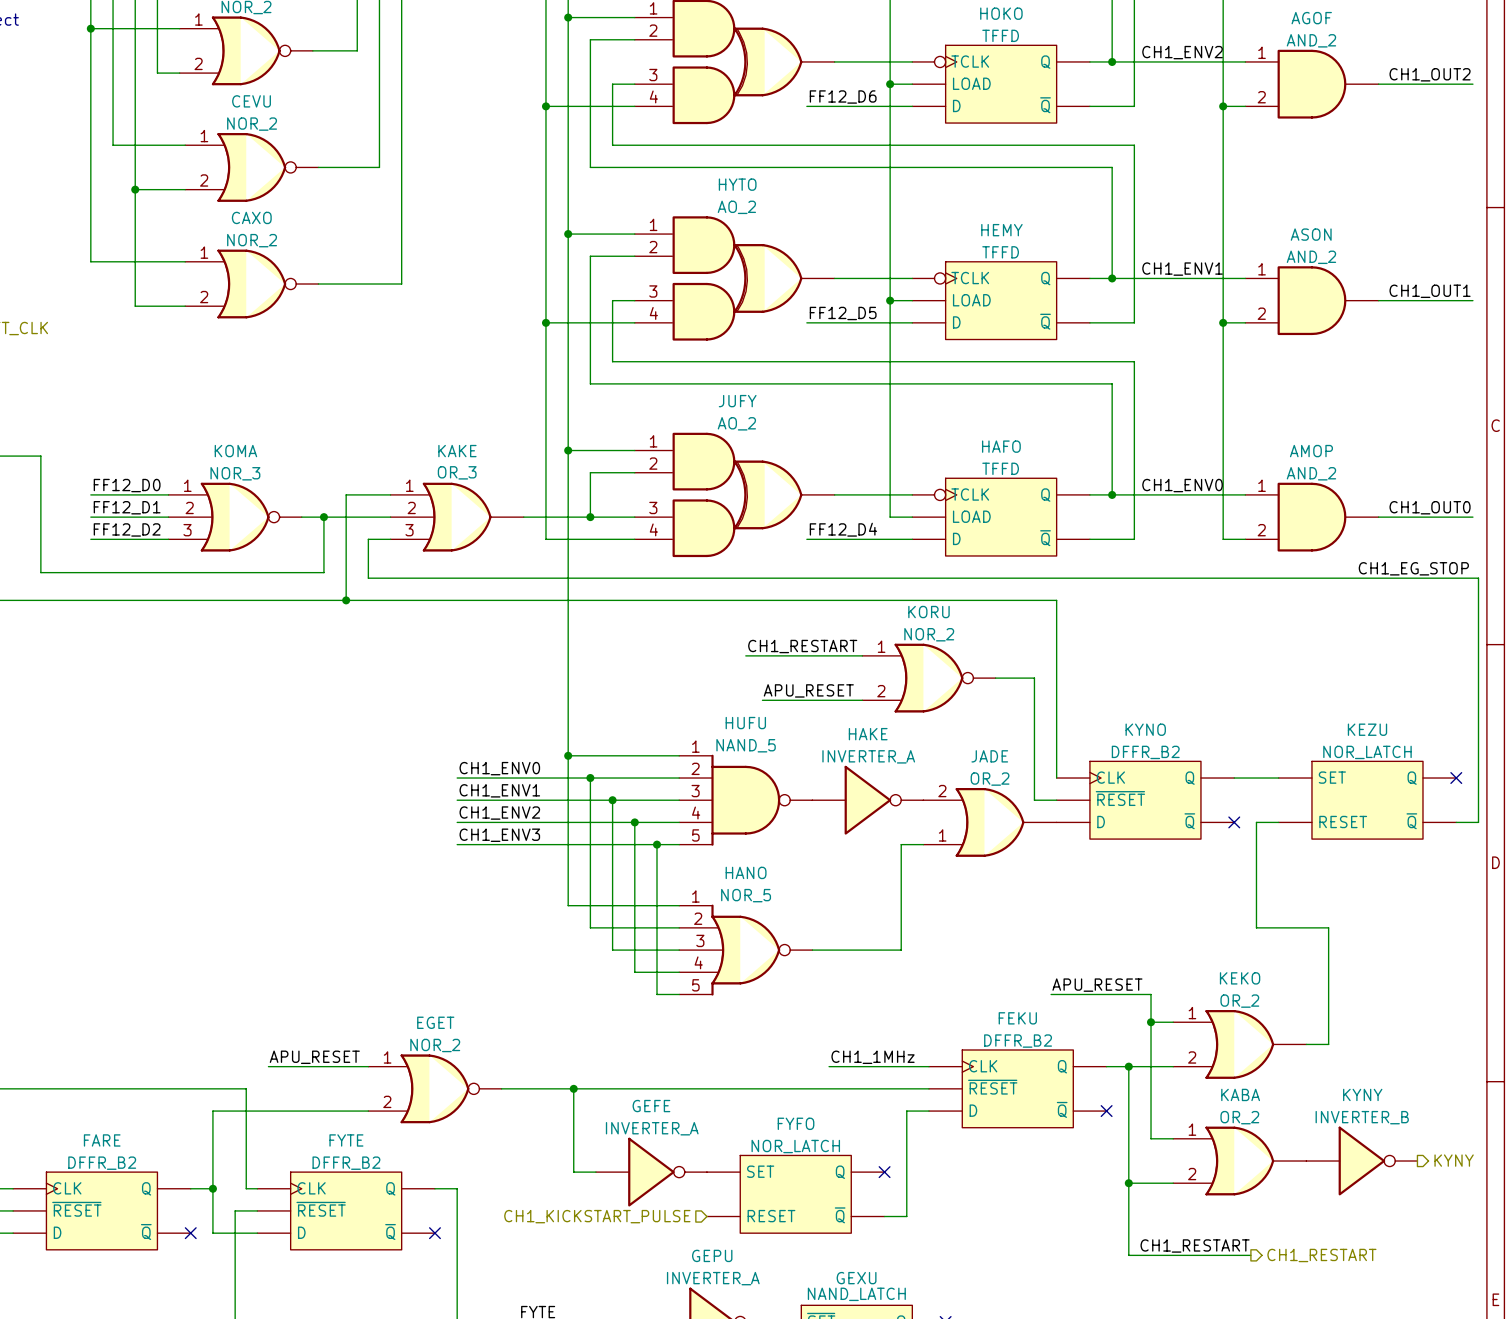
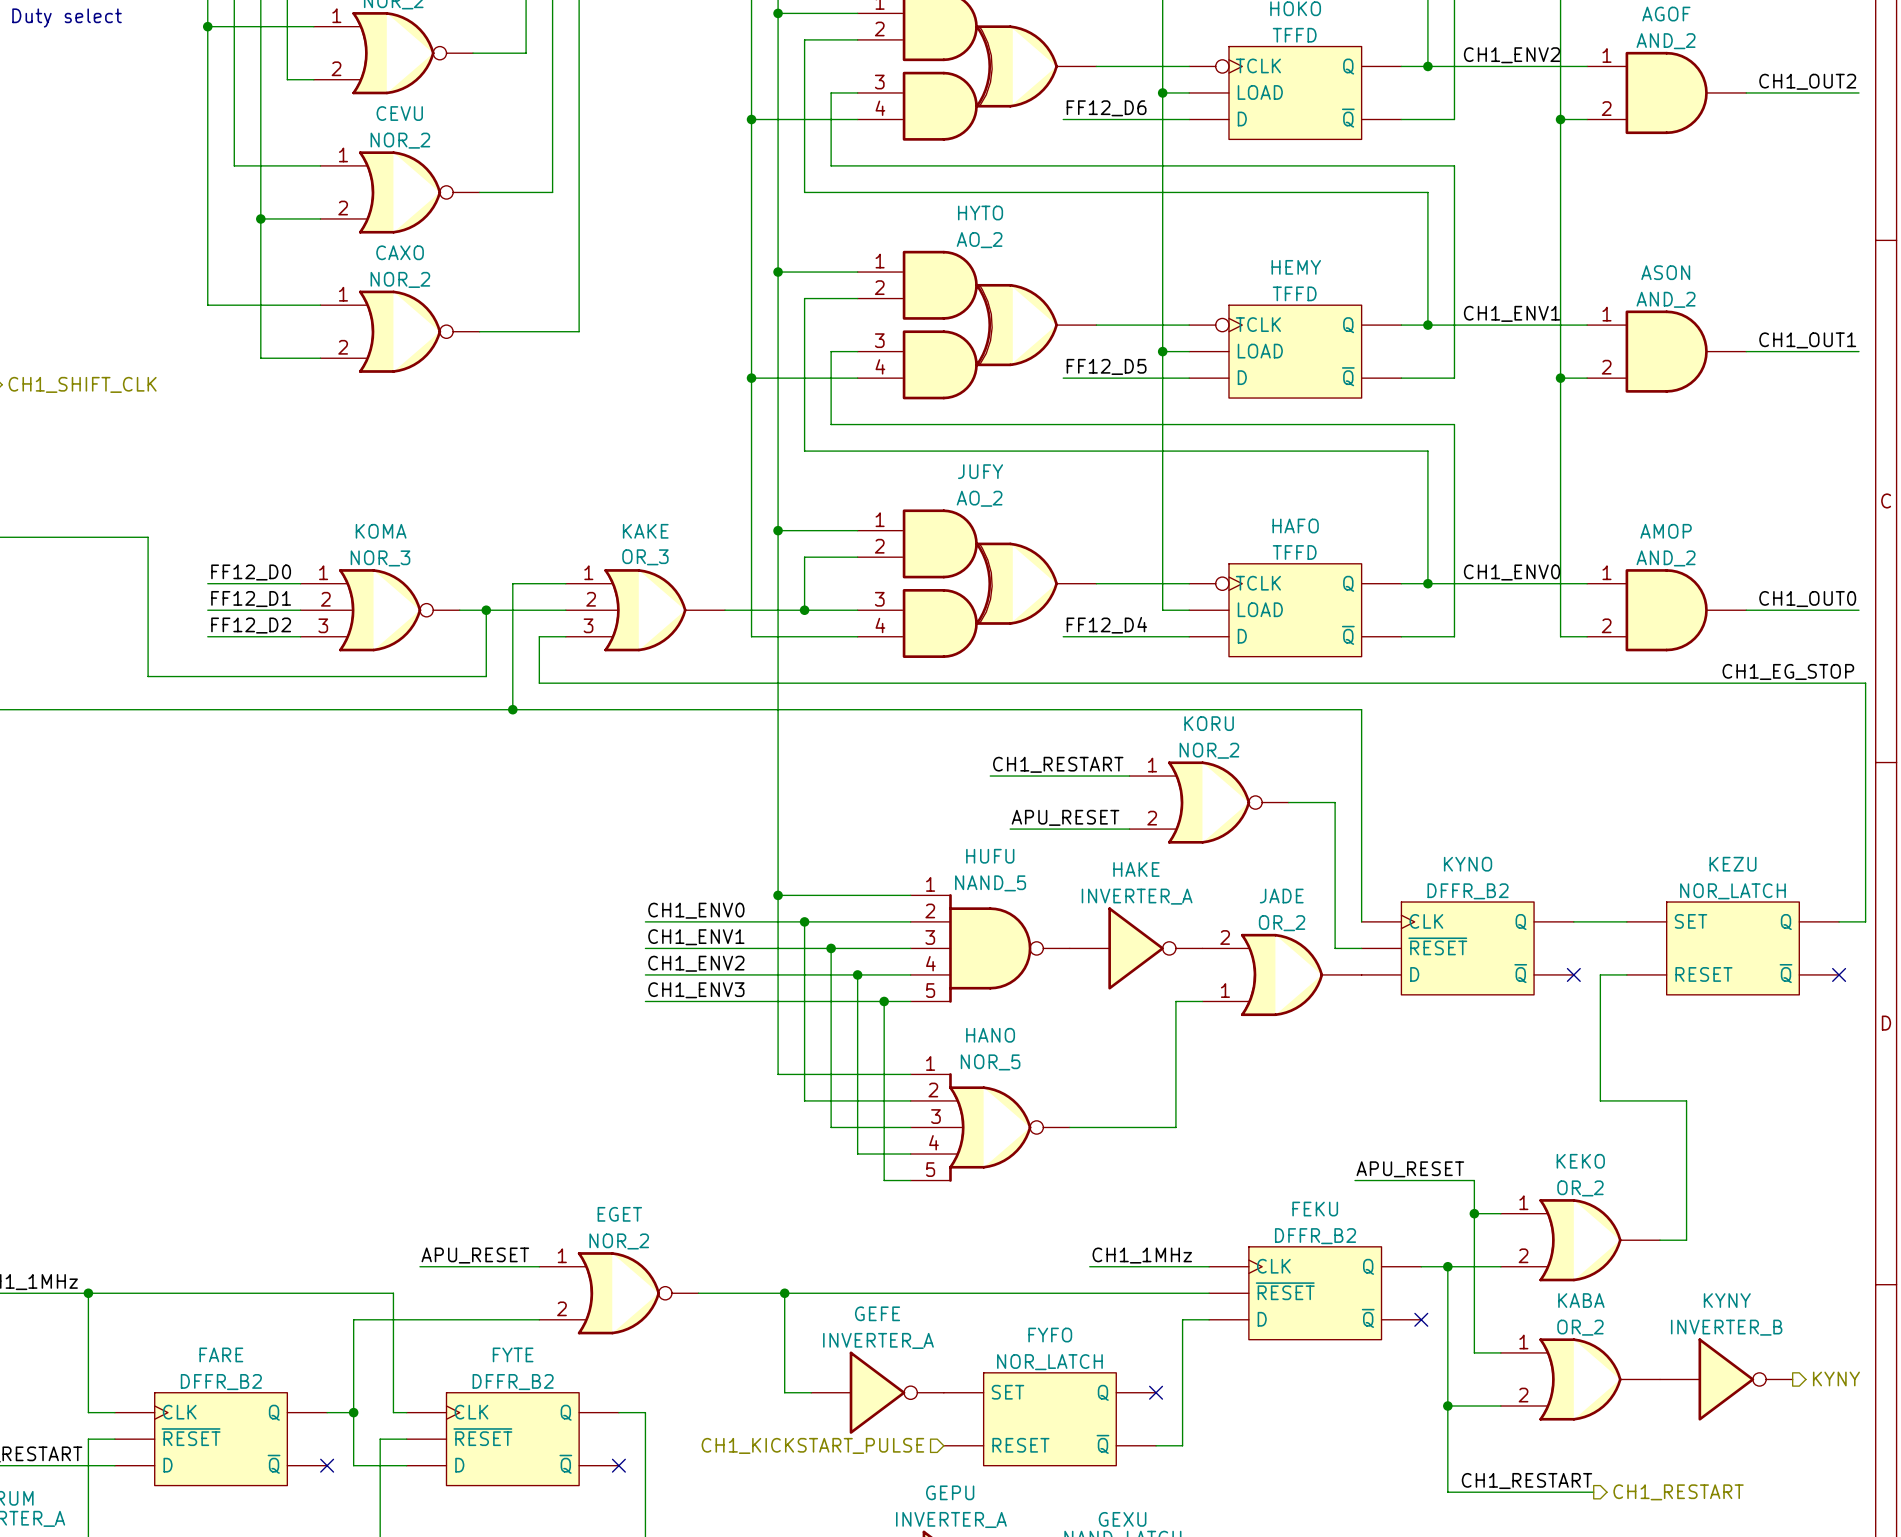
no-connect mark position: (1456, 778) -> (1839, 974)
wire: (1478, 778) (1478, 822) (1456, 822) -> (1865, 921) (1839, 921)

